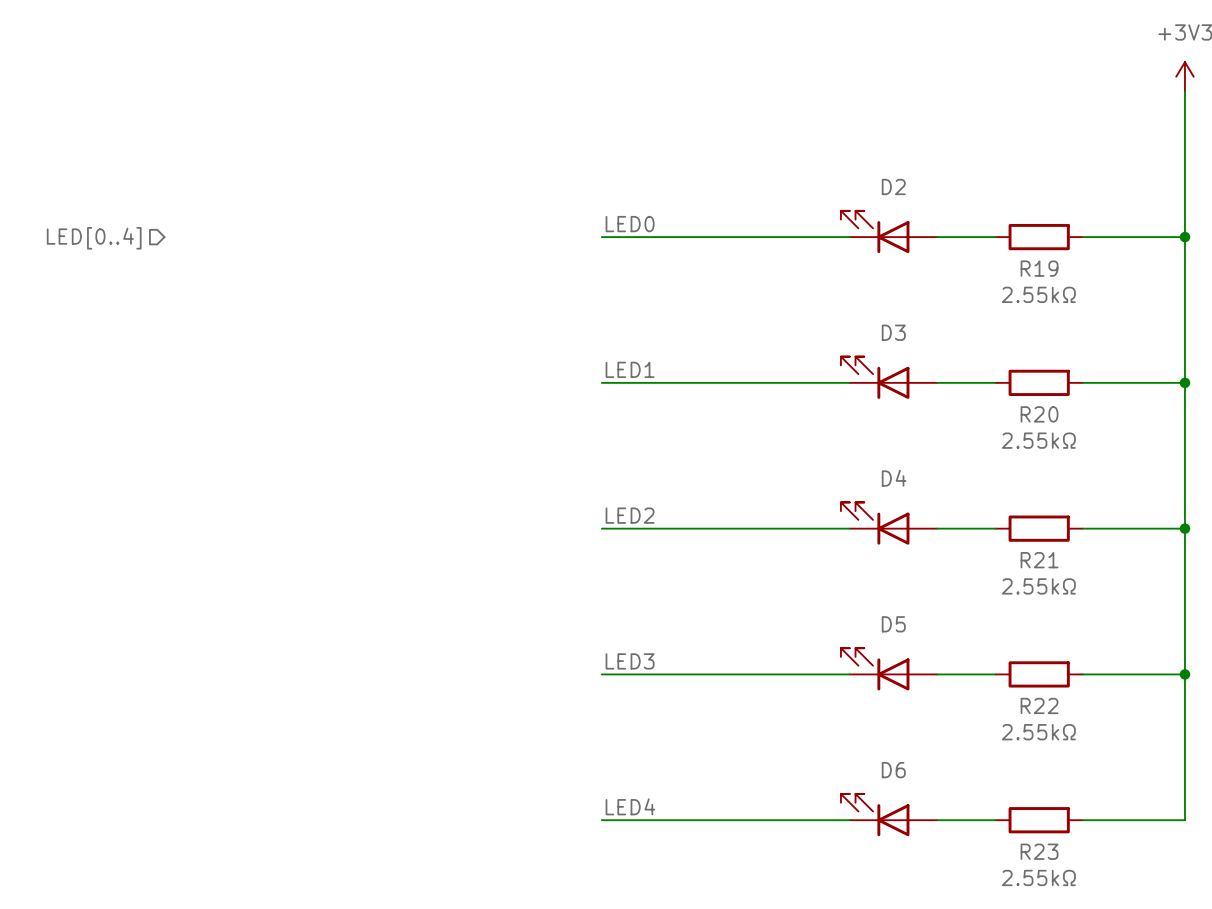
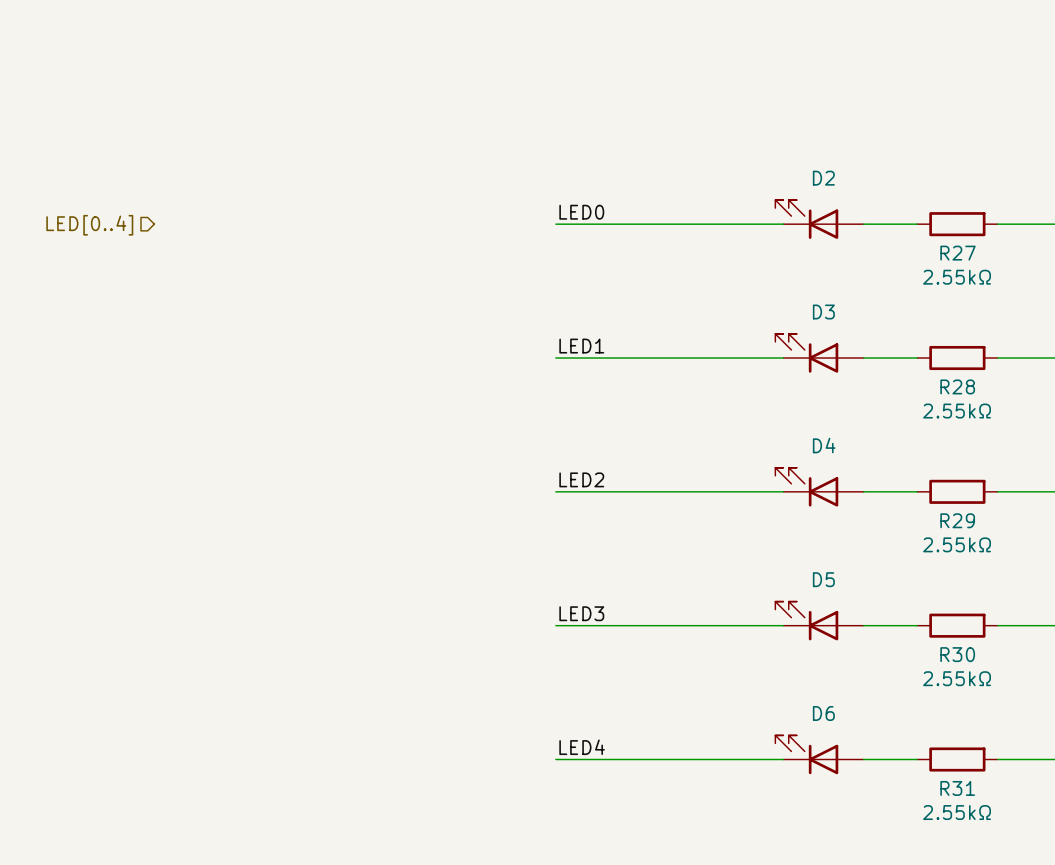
R19 name: R19 (1039, 268) -> R27 (958, 253)
R20 name: R20 (1039, 414) -> R28 (957, 386)
R21 name: R21 (1039, 560) -> R29 (957, 520)
R22 name: R22 (1039, 705) -> R30 (957, 654)
R23 name: R23 (1039, 851) -> R31 (957, 788)

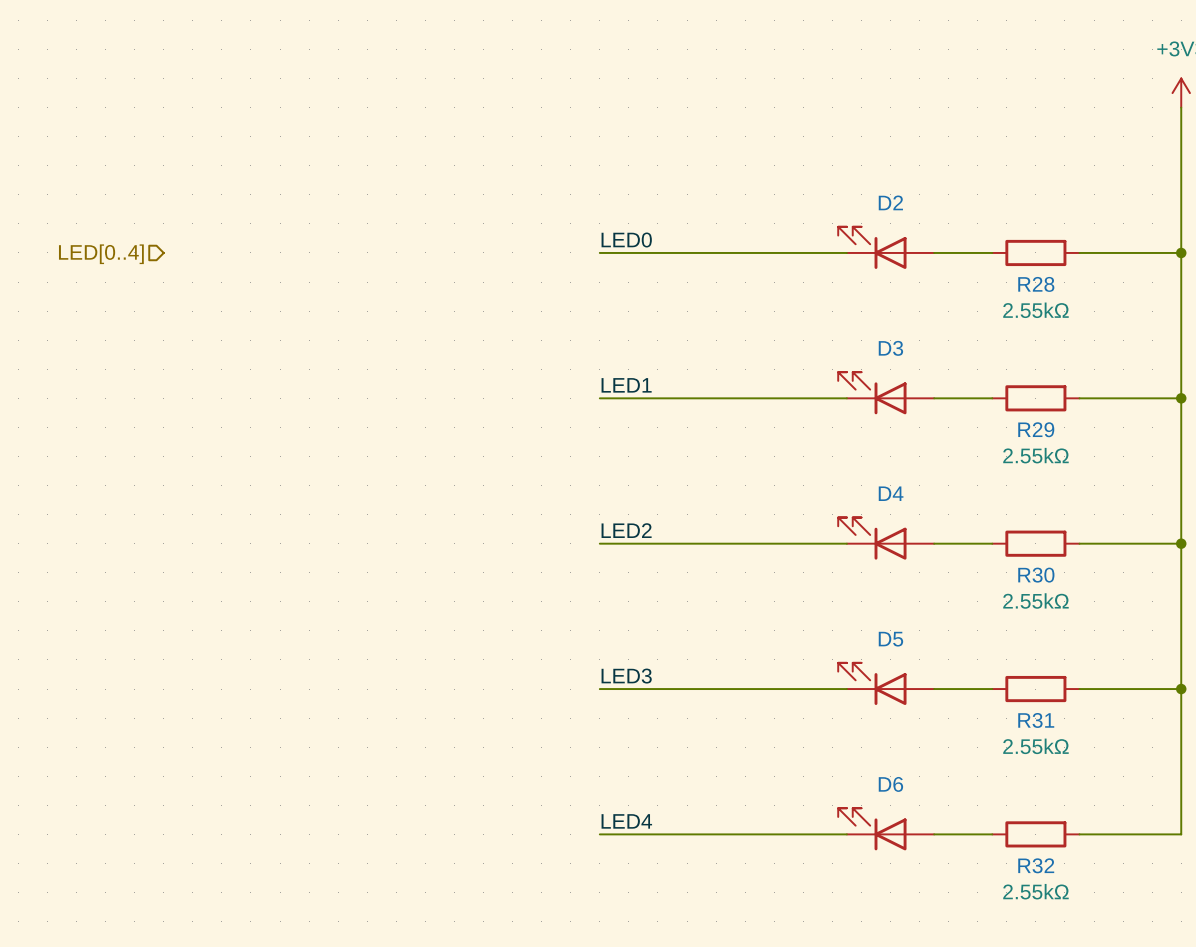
R27 name: R27 (958, 253) -> R28 (1036, 284)
R28 name: R28 (957, 386) -> R29 (1036, 429)
R29 name: R29 (957, 520) -> R30 (1036, 575)
R30 name: R30 (957, 654) -> R31 (1036, 720)
R31 name: R31 (957, 788) -> R32 (1036, 865)

